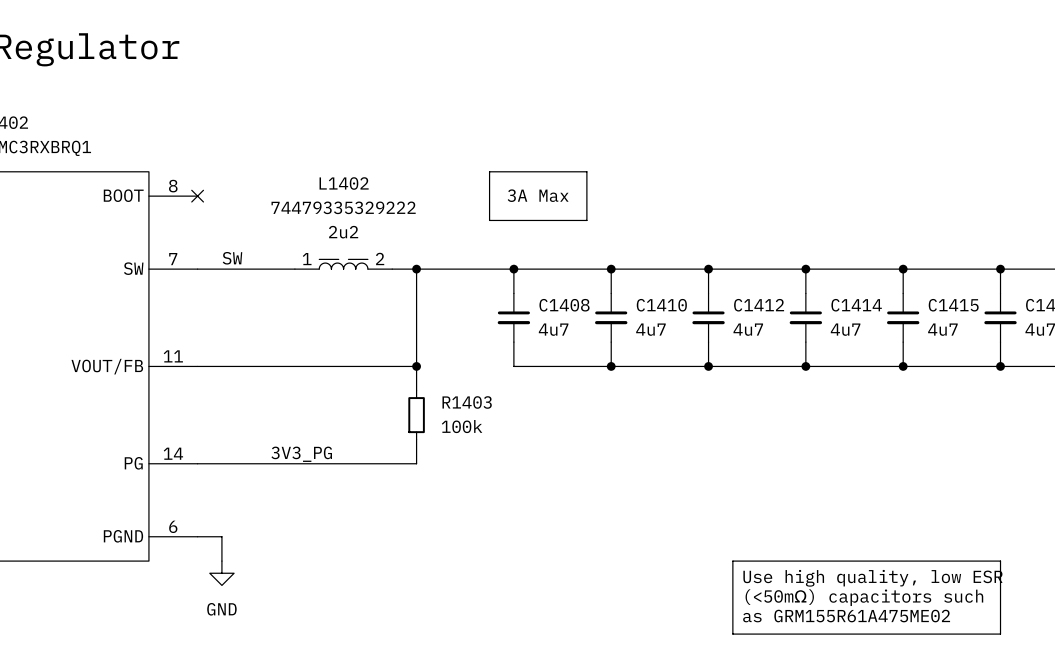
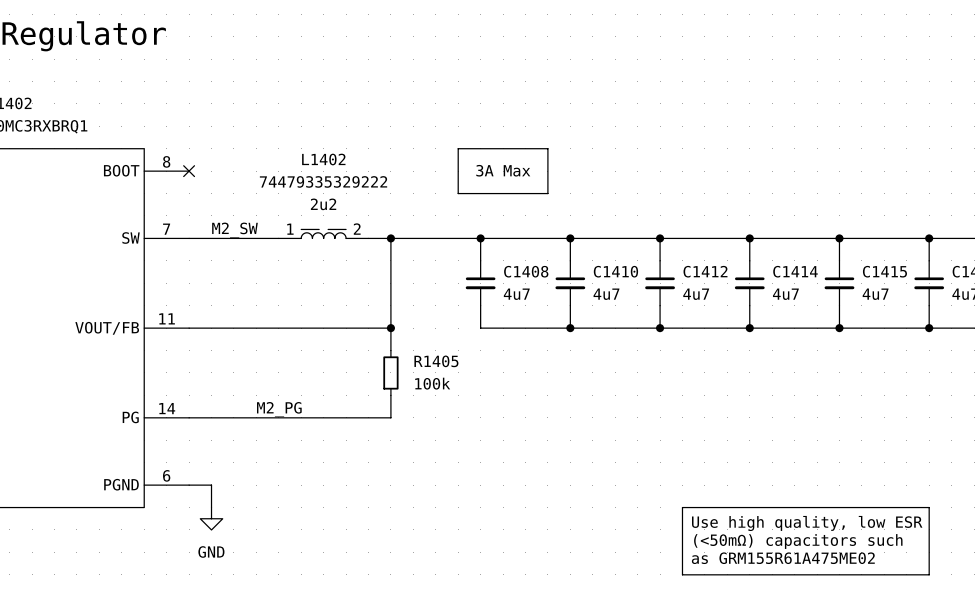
label: SW (232, 258) -> M2_SW (234, 230)
R1403 name: R1403 (467, 402) -> R1405 (436, 361)
label: 3V3_PG (301, 454) -> M2_PG (279, 409)

